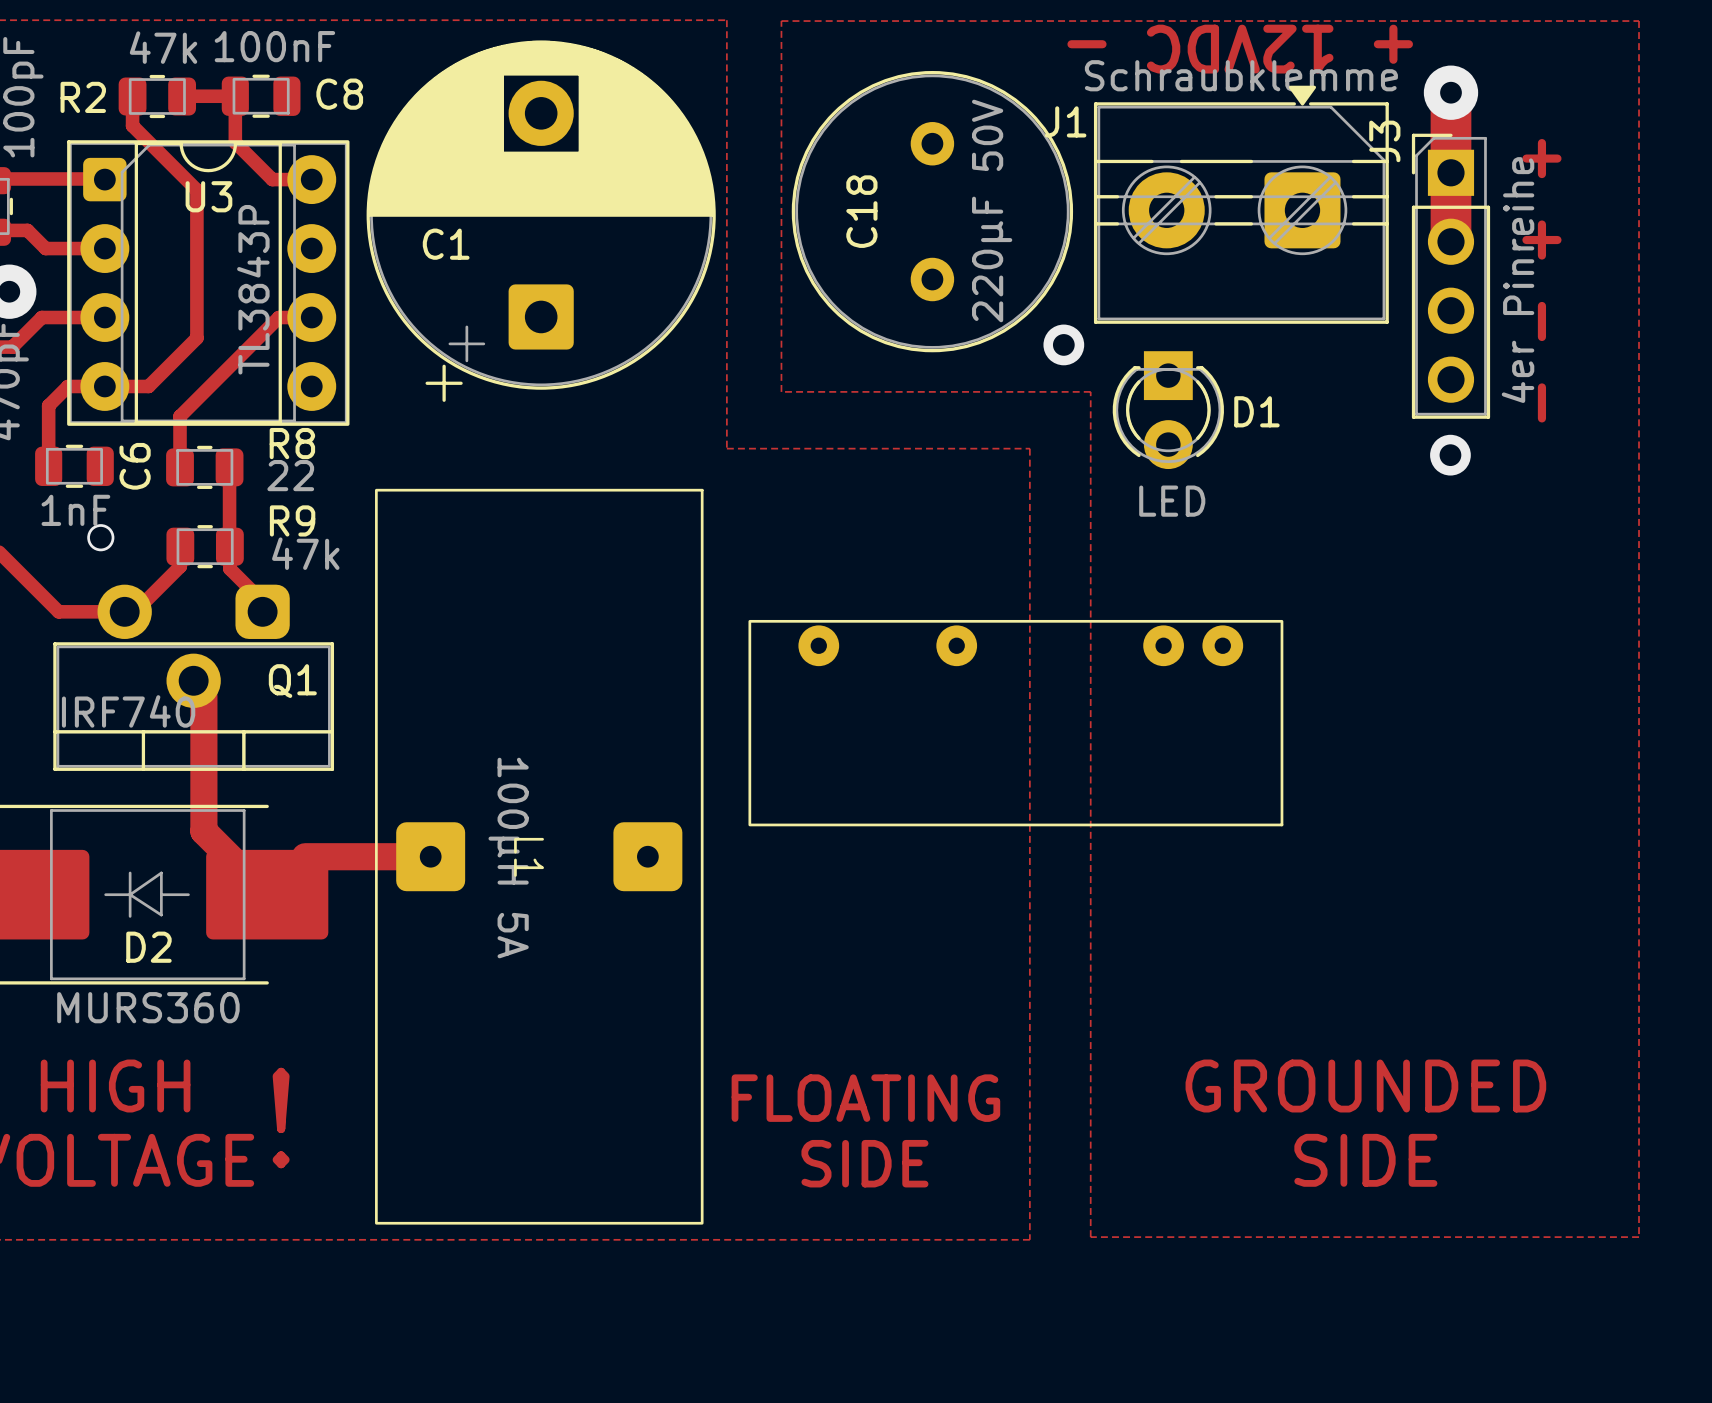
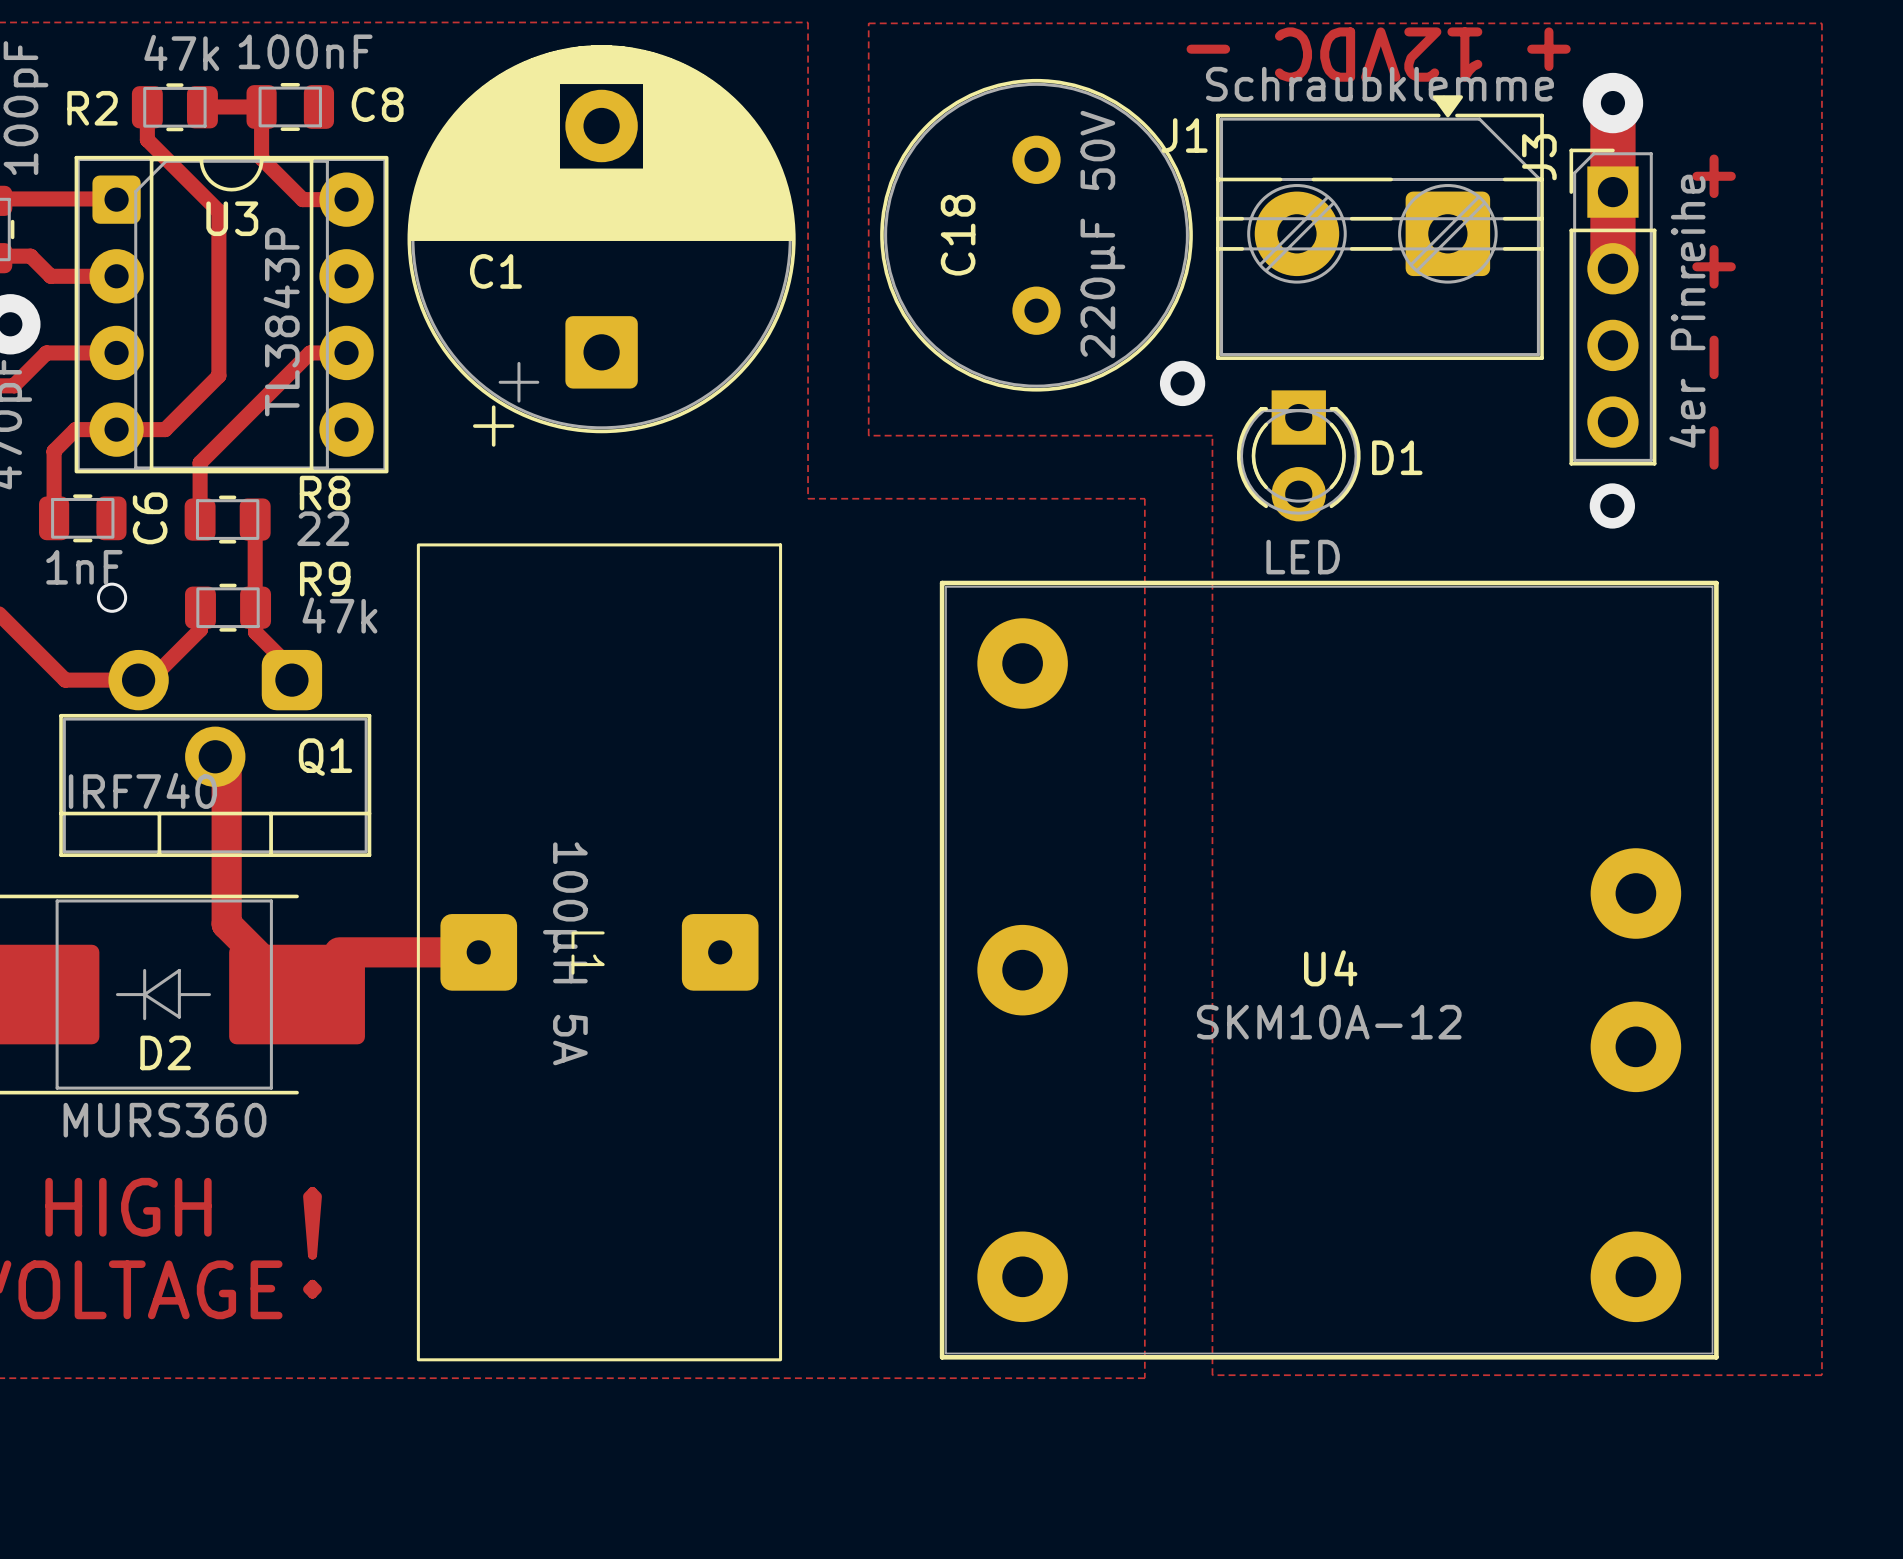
part: (1015, 723) -> none
U4: none -> SKM10A-12 (1329, 970)
text: GROUNDED (1365, 1086) -> none
text: FLOATING (865, 1098) -> none
text: SIDE (1365, 1160) -> none
text: SIDE (864, 1163) -> none

